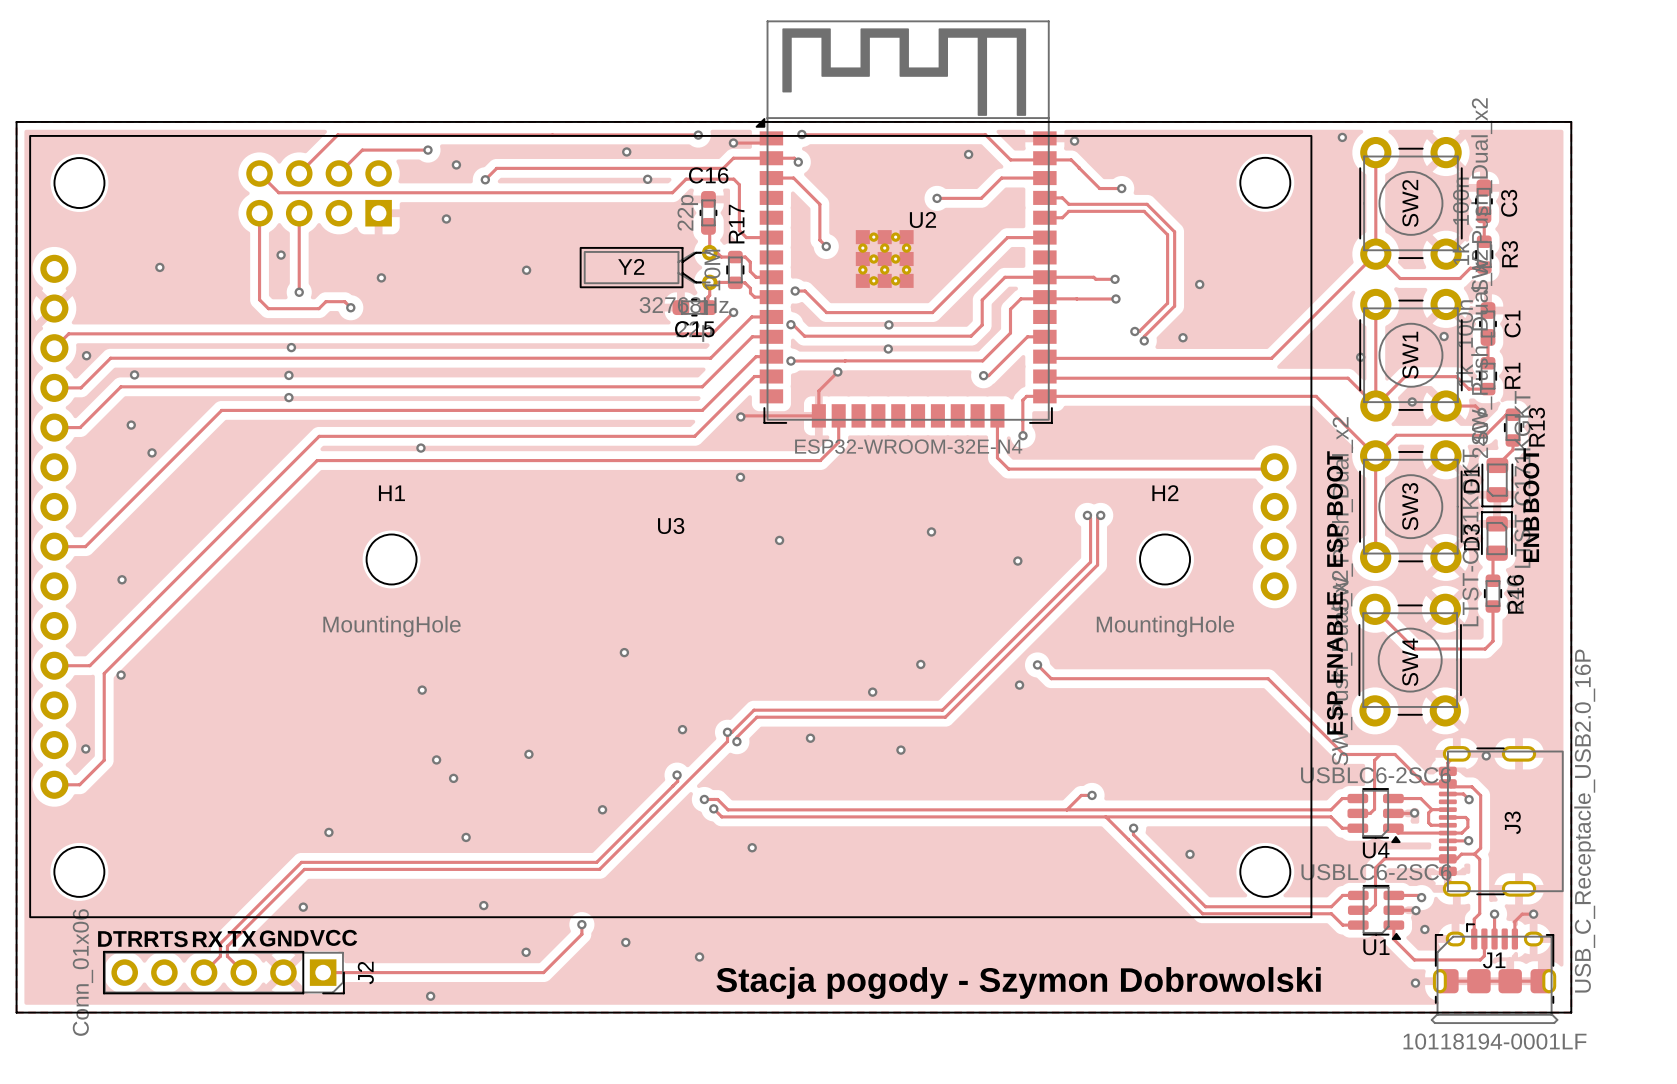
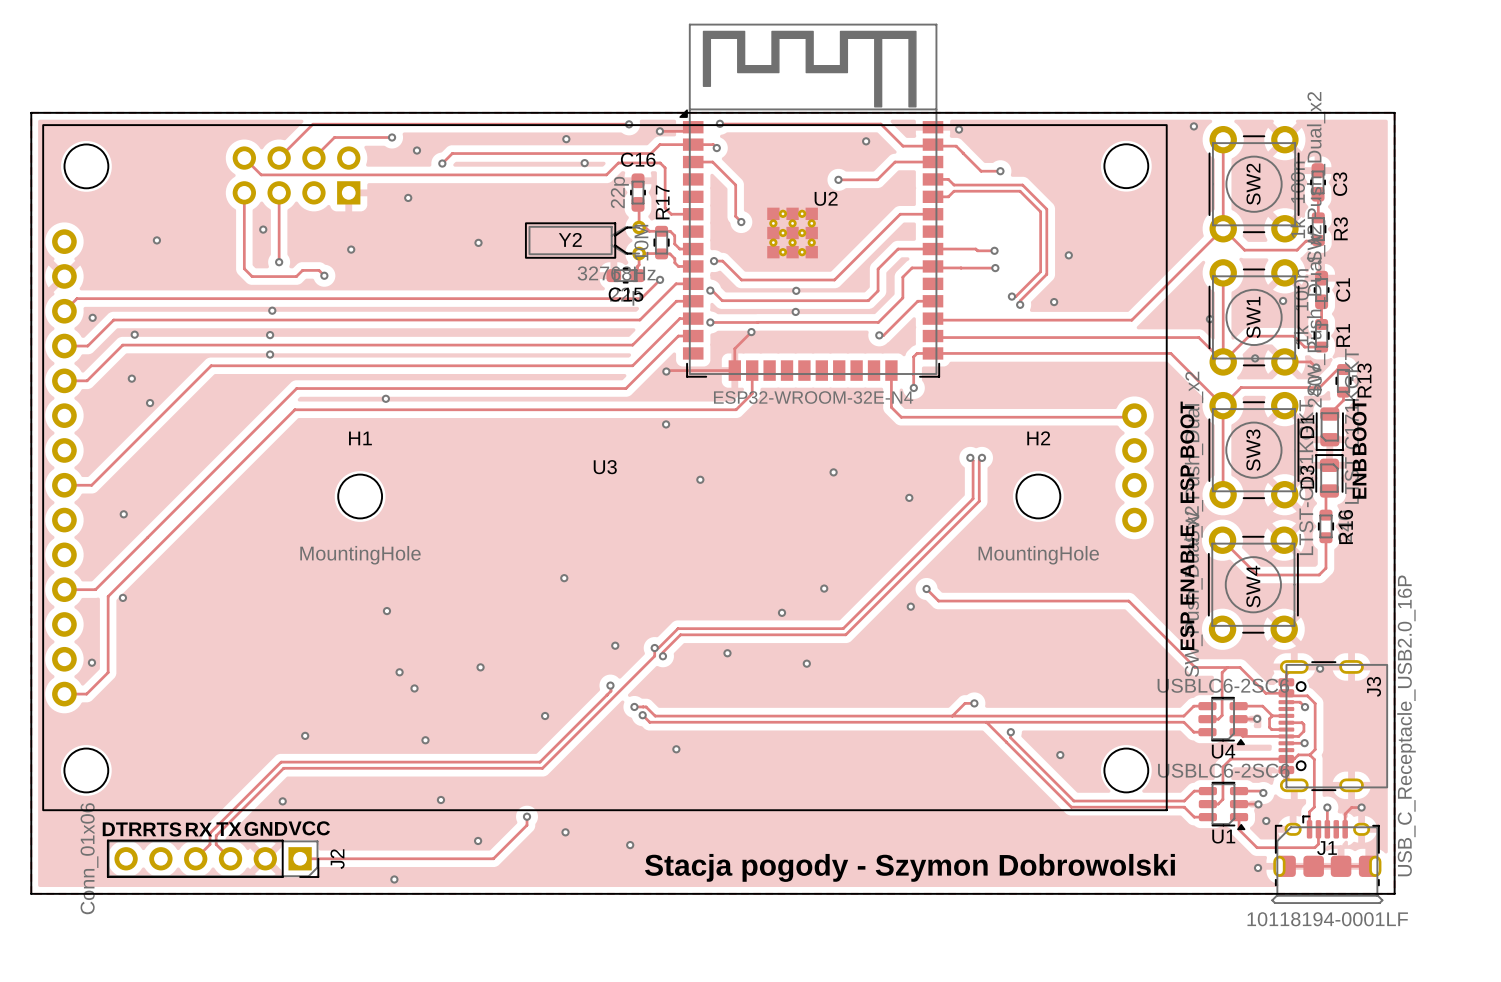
J3 footprint: [1438, 746, 1564, 897] -> [1278, 660, 1388, 793]
J3 name position: J3 (1512, 822) -> J3 (1373, 686)

